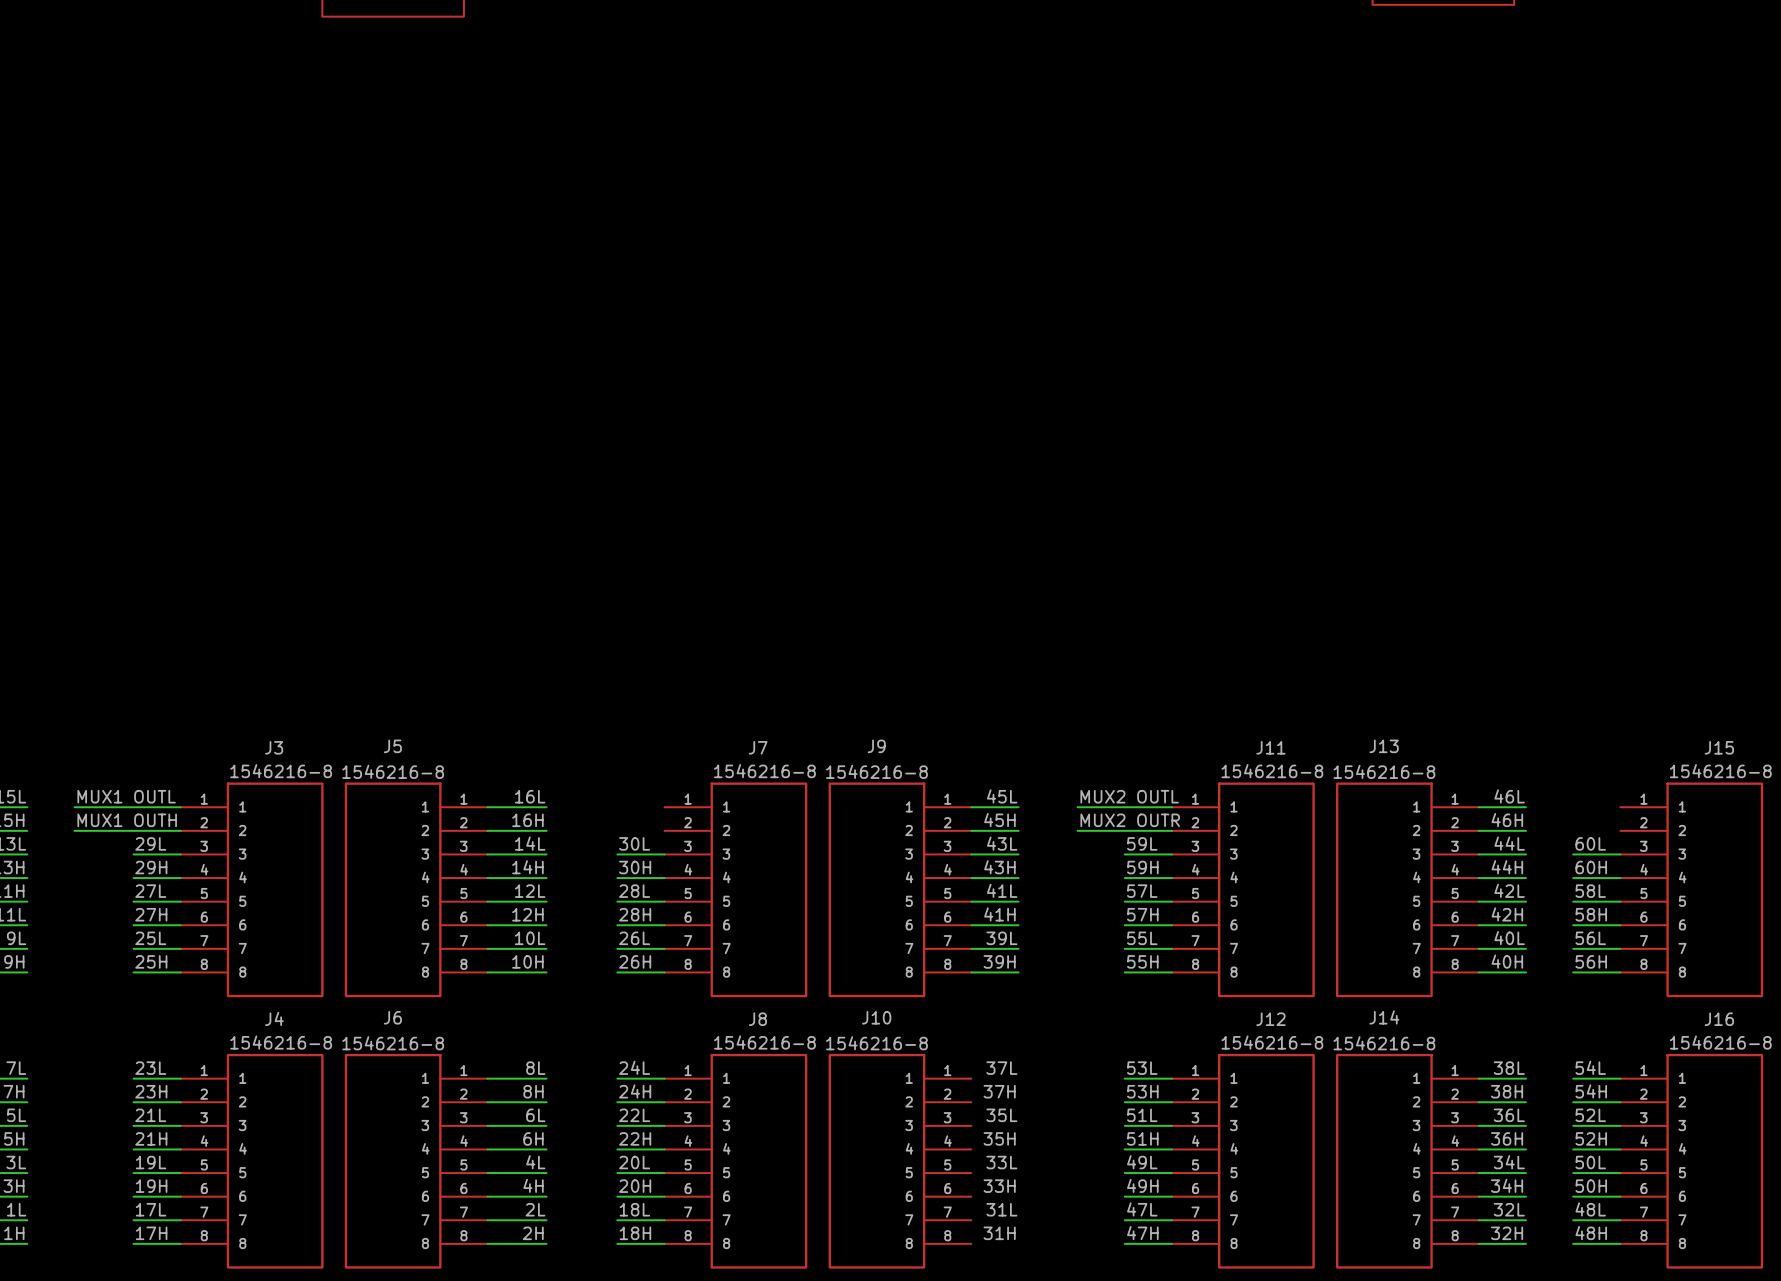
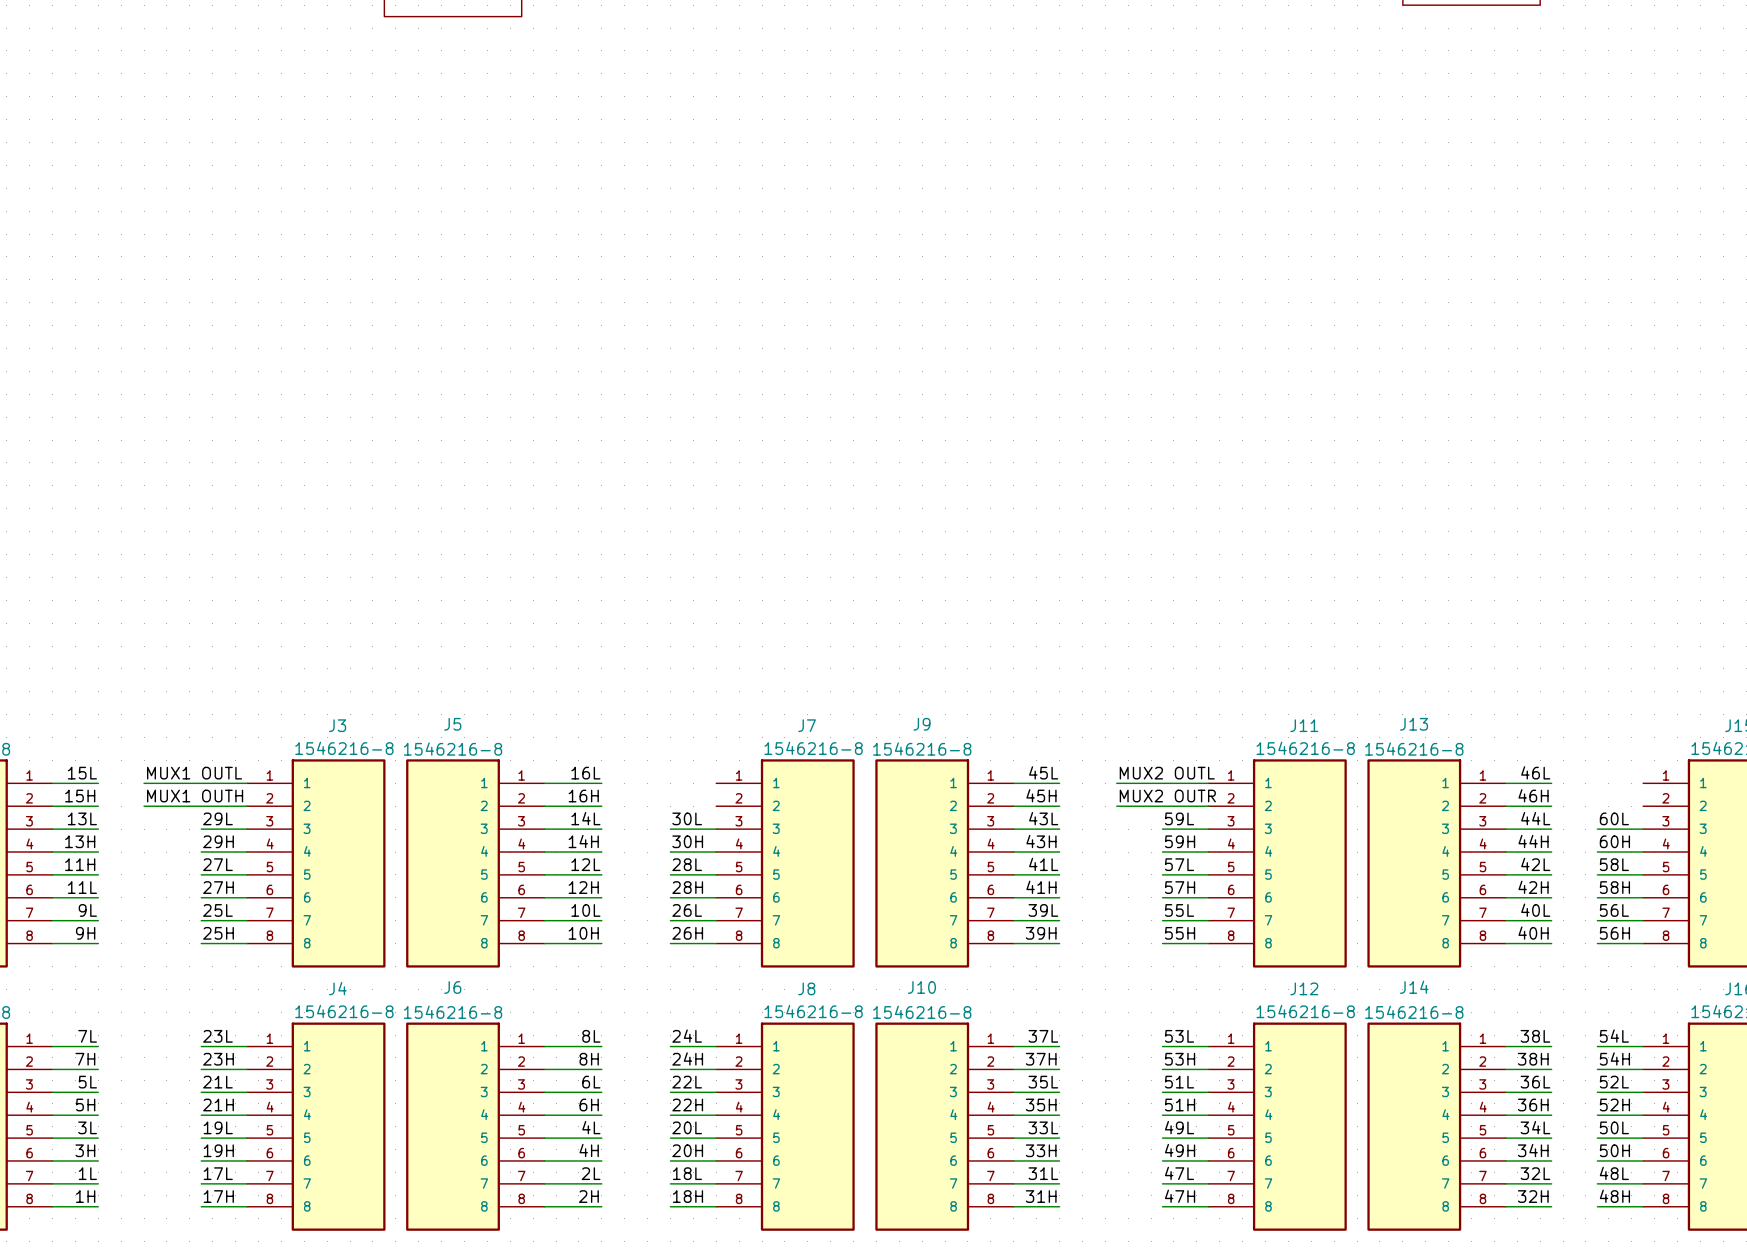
wire: none -> (1013, 1046) (1059, 1046)
wire: none -> (1013, 1069) (1059, 1069)
wire: none -> (1013, 1092) (1059, 1092)
wire: none -> (1013, 1115) (1059, 1115)
wire: none -> (1013, 1138) (1059, 1138)
wire: none -> (1013, 1160) (1059, 1160)
wire: none -> (1013, 1183) (1059, 1183)
wire: none -> (1013, 1206) (1059, 1206)

